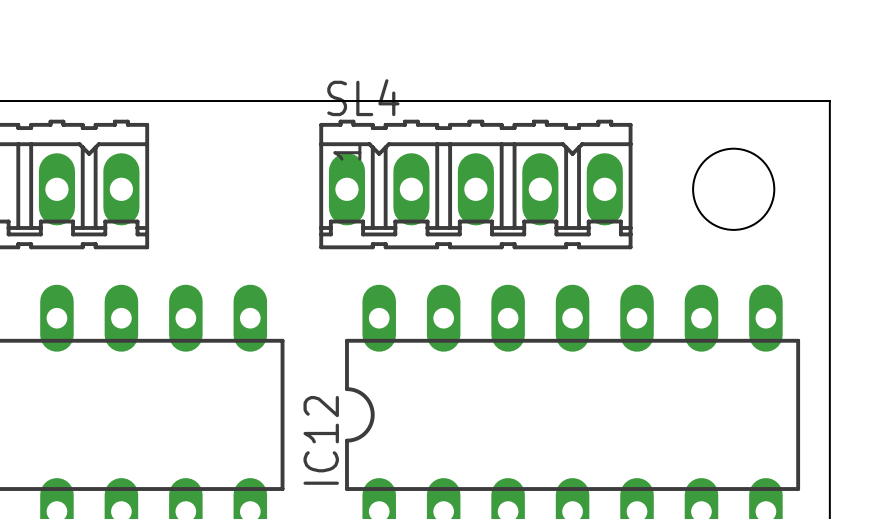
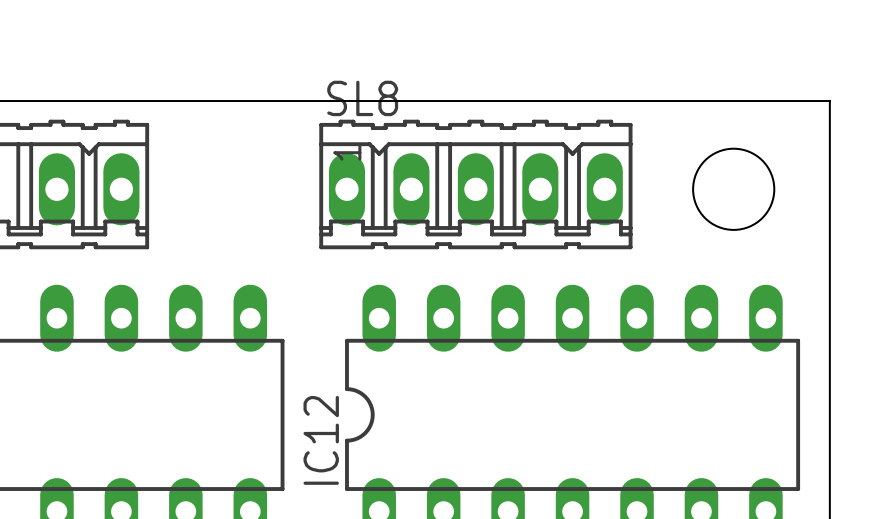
SL4 name: SL4 (363, 97) -> SL8 (362, 98)

